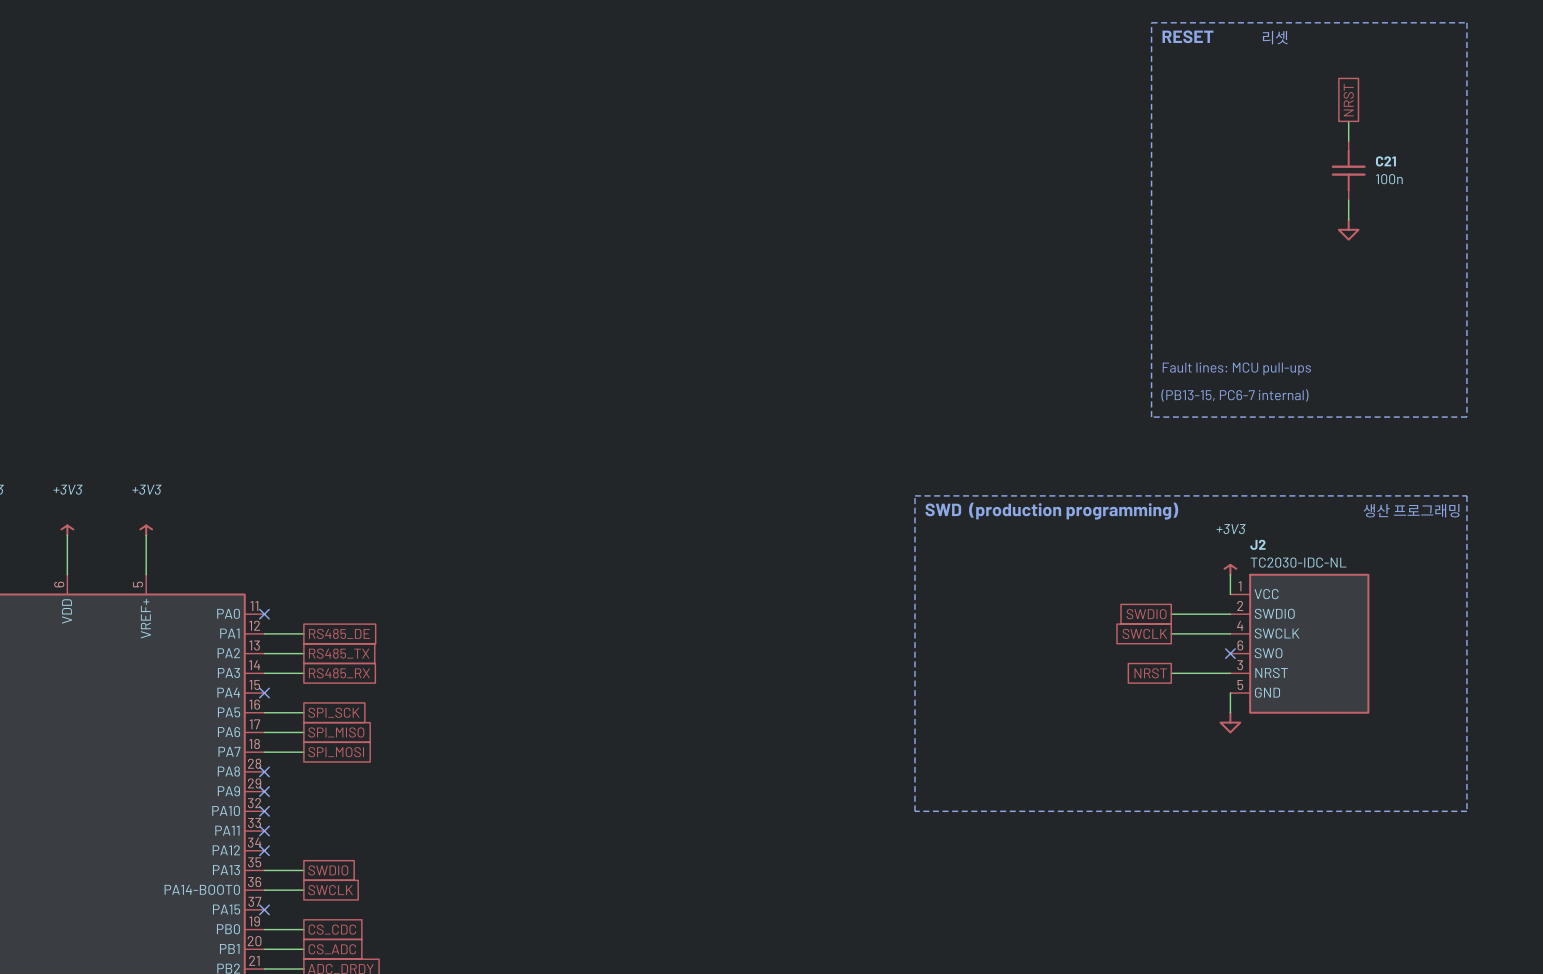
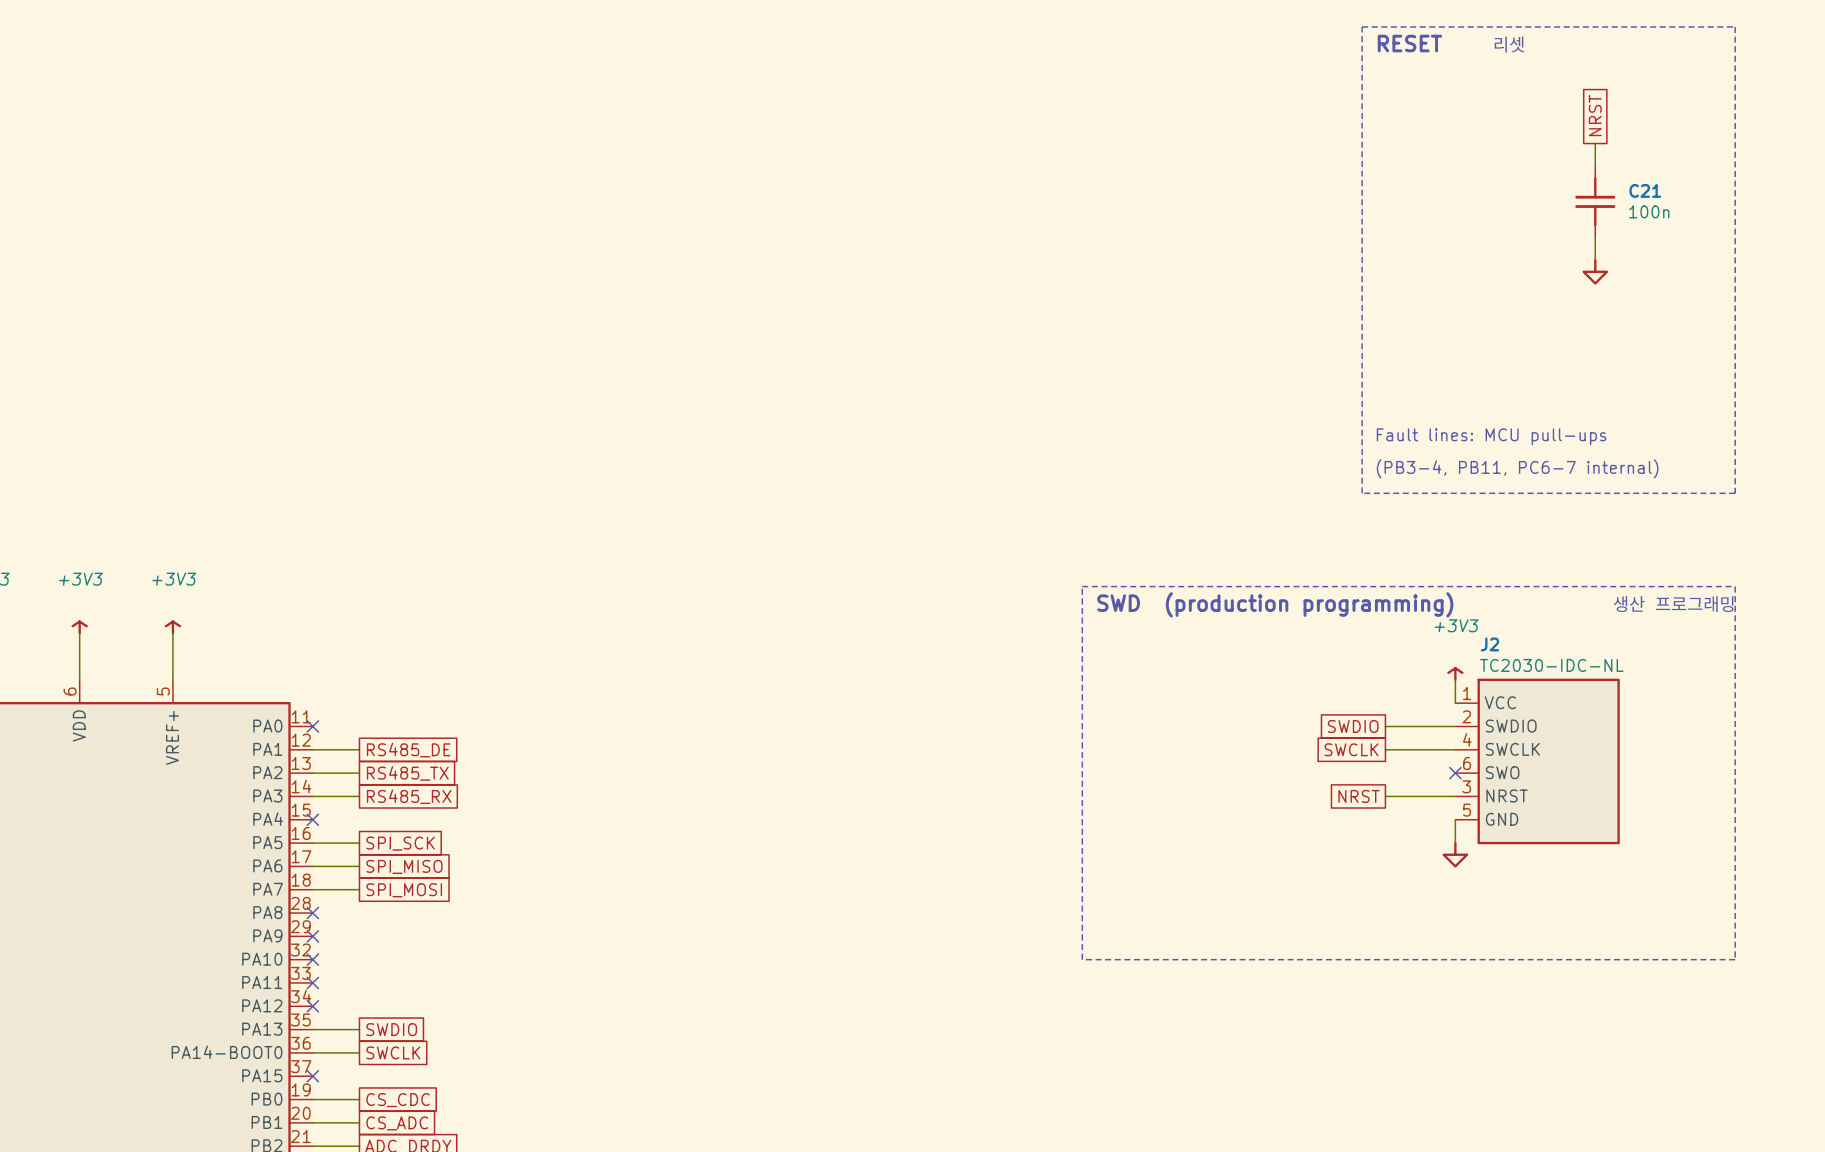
text: (PB13-15, PC6-7 internal) (1234, 395) -> (PB3-4, PB11, PC6-7 internal) (1517, 468)

